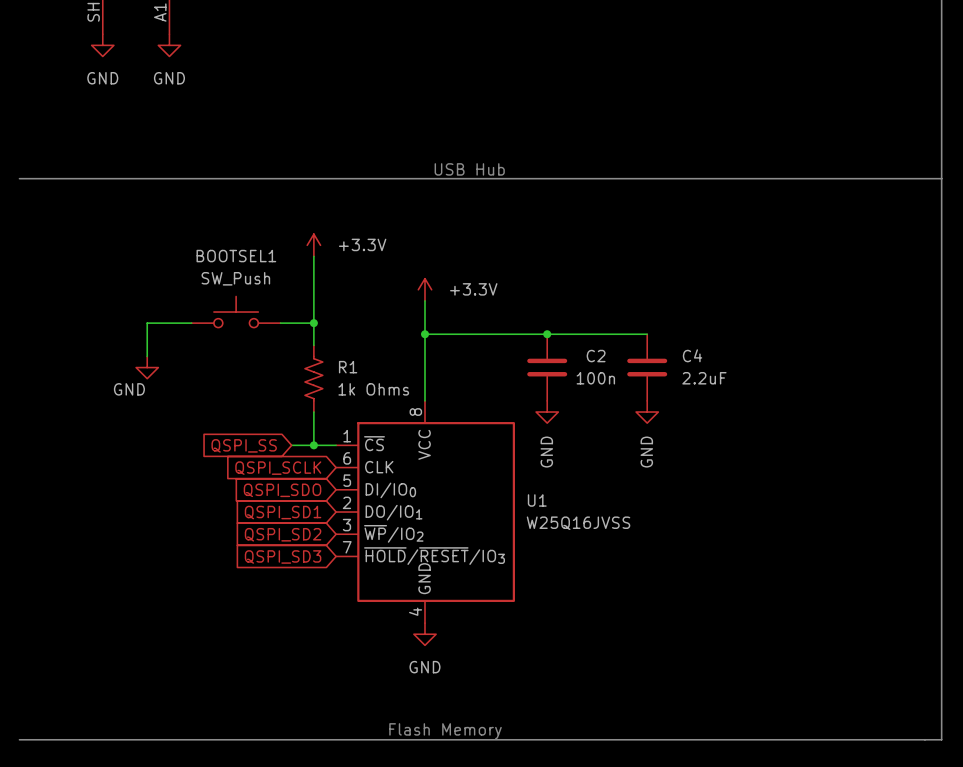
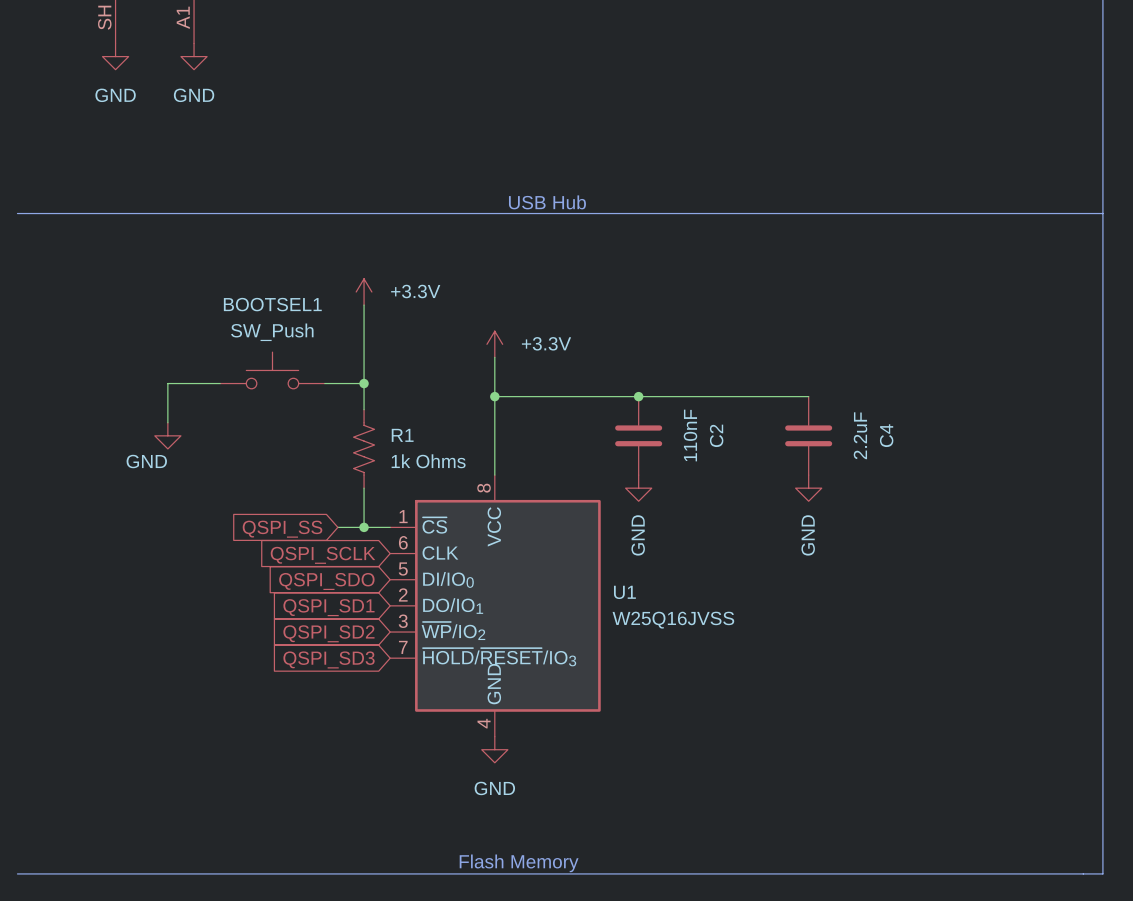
wire: none -> (756, 396) (808, 396)
C4 name rotation: 0° (692, 355) -> 90° counterclockwise (886, 435)
C2 name rotation: 0° (596, 356) -> 90° counterclockwise (716, 435)
C4 position: (647, 367) -> (808, 435)
C2 value: 100n (595, 378) -> 110nF (690, 435)
C4 value rotation: 0° (704, 378) -> 90° counterclockwise (860, 435)
power symbol position: GND (647, 412) -> GND (808, 488)

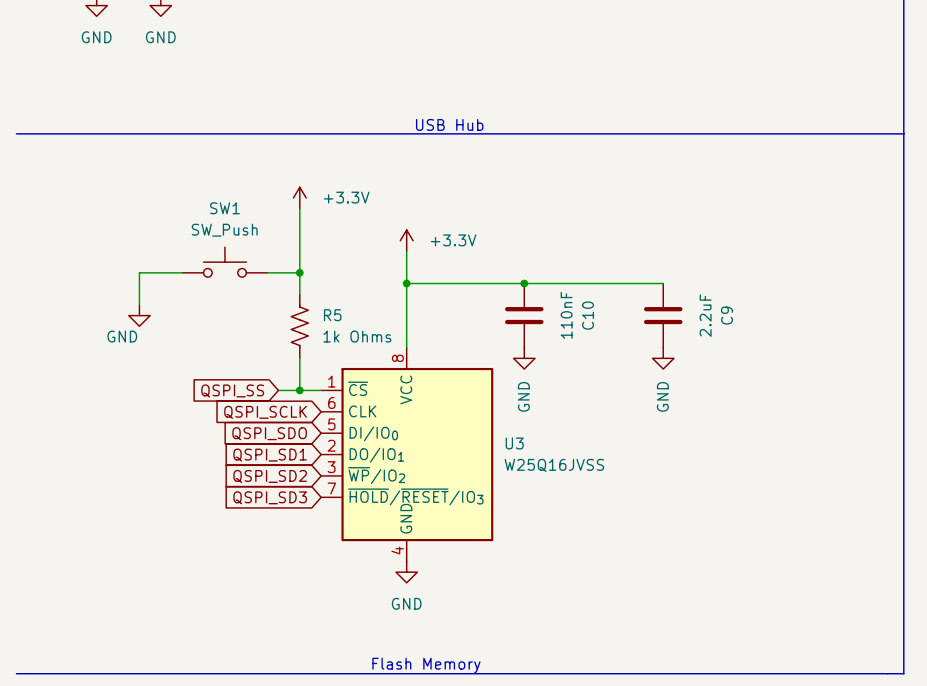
BOOTSEL1 name: BOOTSEL1 (272, 304) -> SW1 (224, 208)
R1 name: R1 (402, 435) -> R5 (332, 315)
C2 name: C2 (716, 435) -> C10 (588, 315)
C4 name: C4 (886, 435) -> C9 (726, 315)
U1 name: U1 (624, 592) -> U3 (514, 443)

